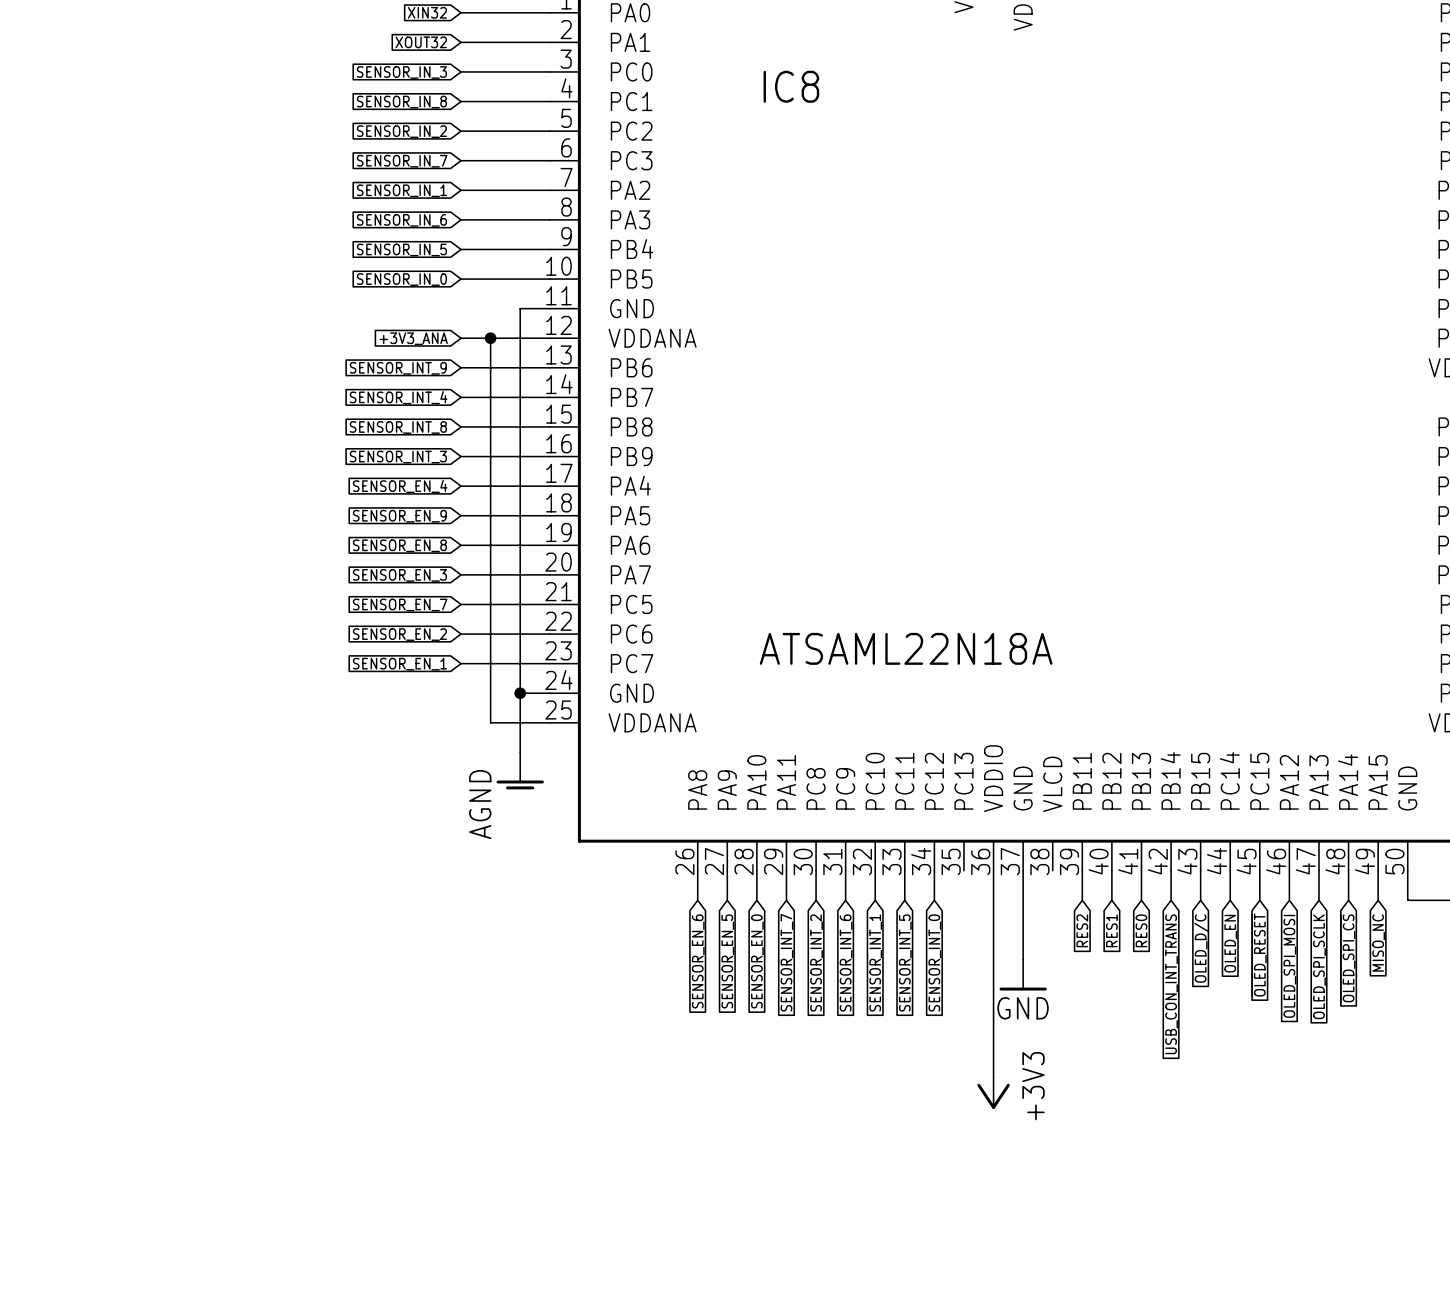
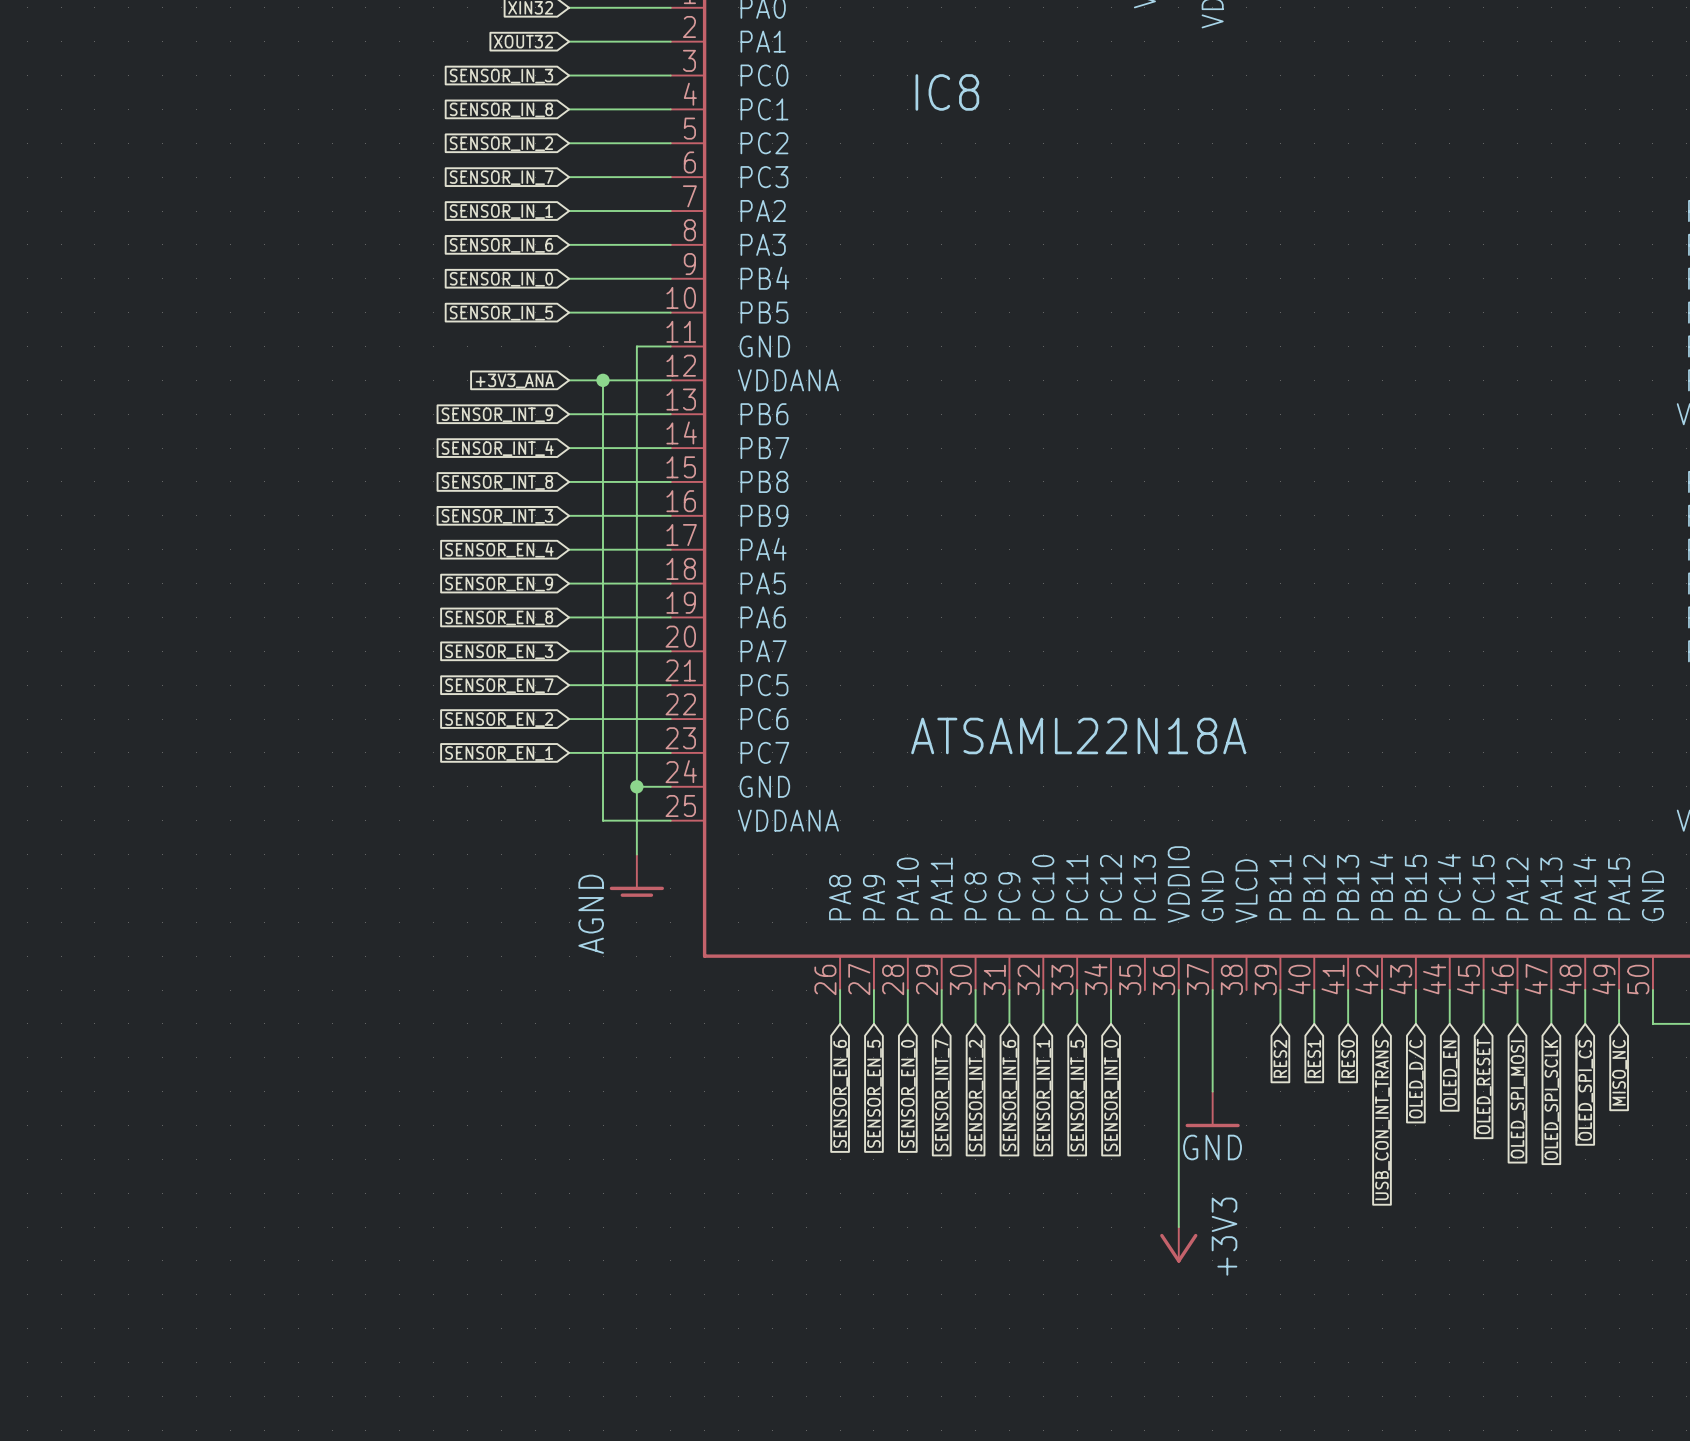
global label: SENSOR_IN_5 (401, 249) -> SENSOR_IN_0 (501, 279)
global label: SENSOR_IN_0 (401, 279) -> SENSOR_IN_5 (501, 313)

